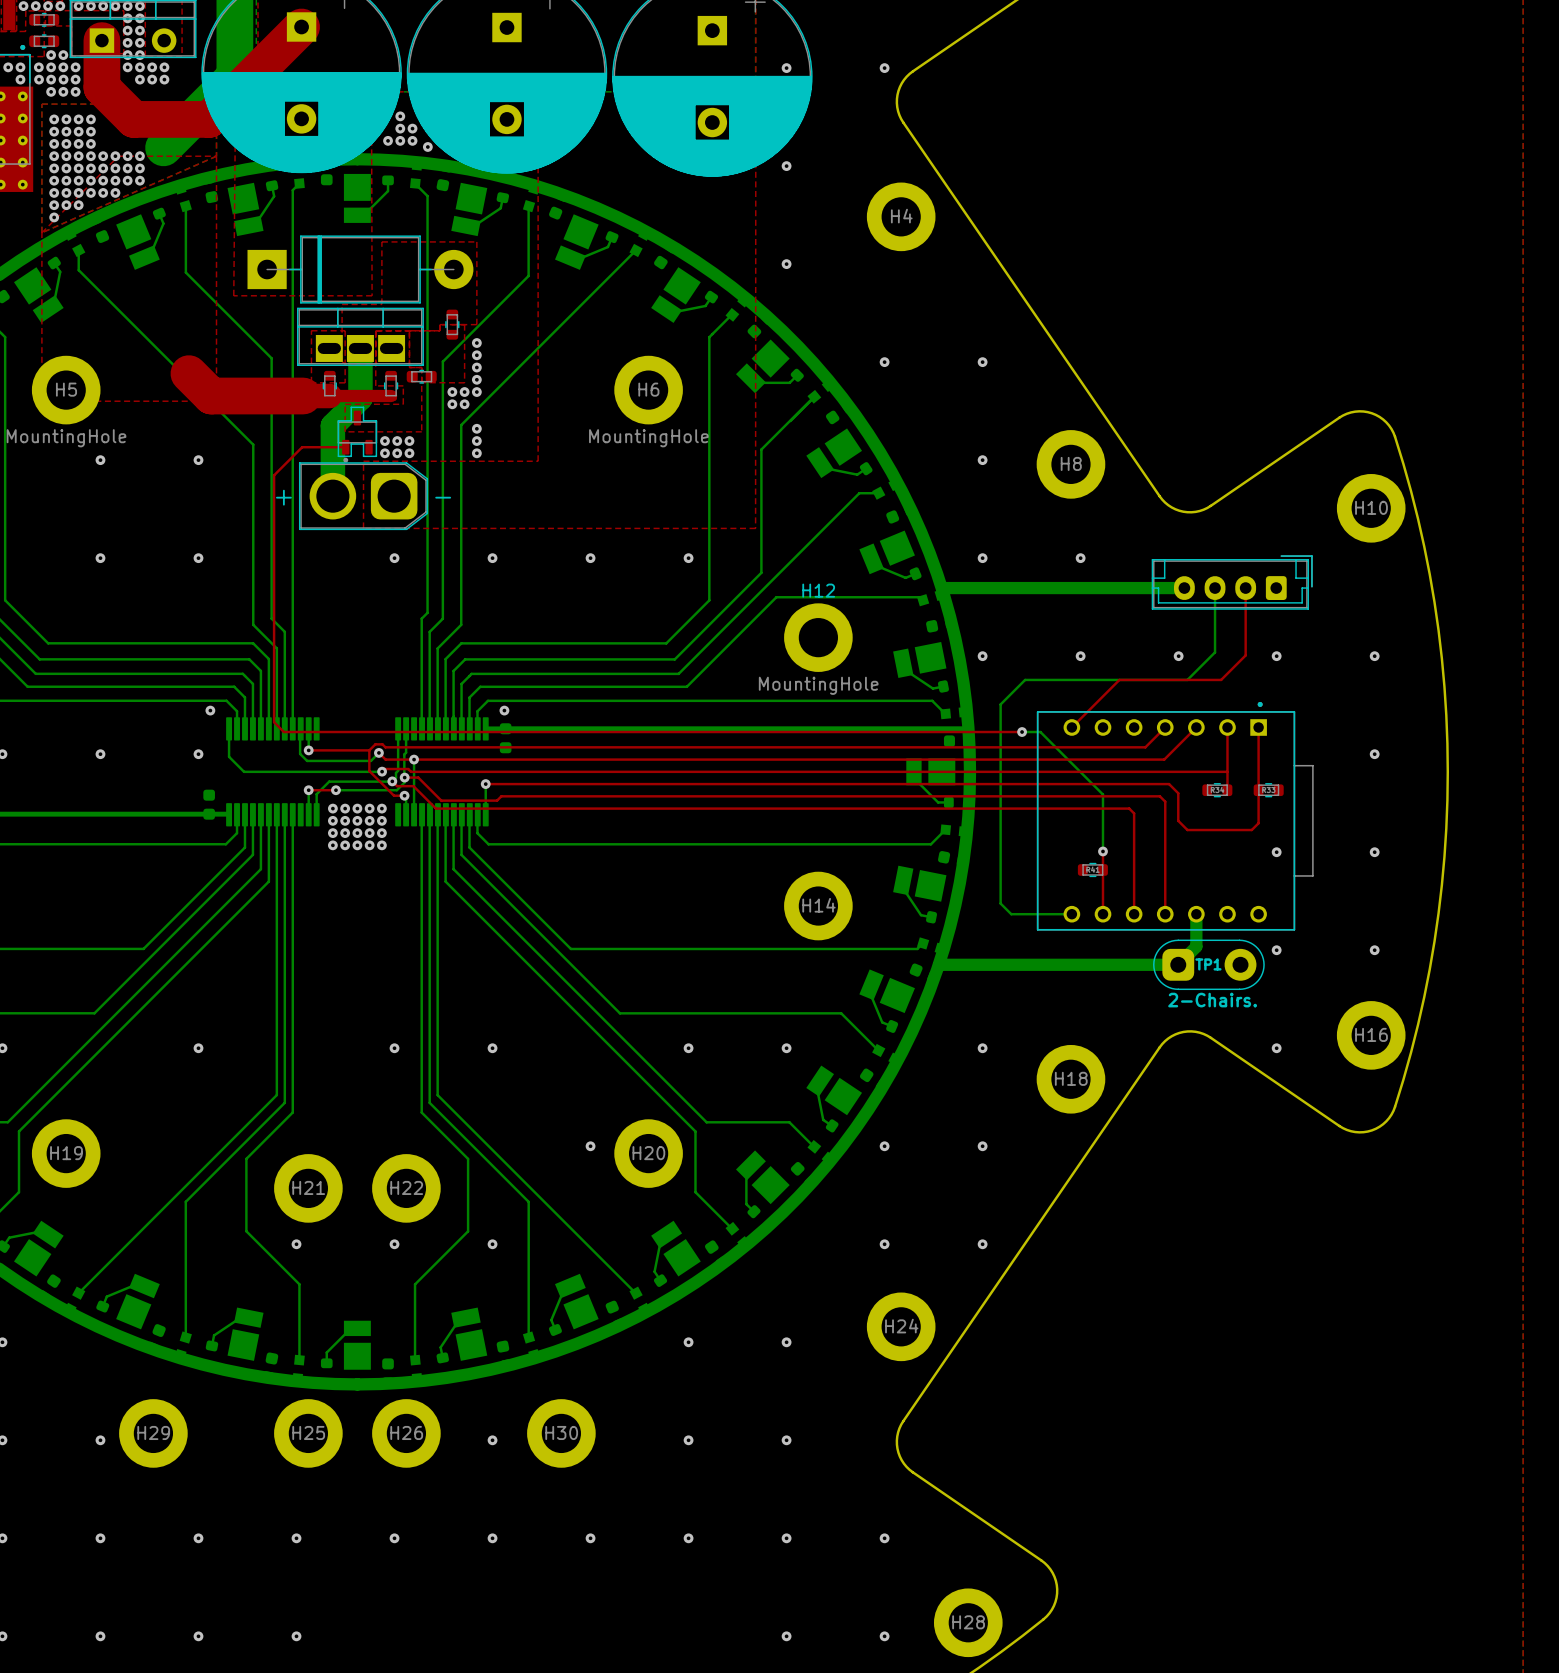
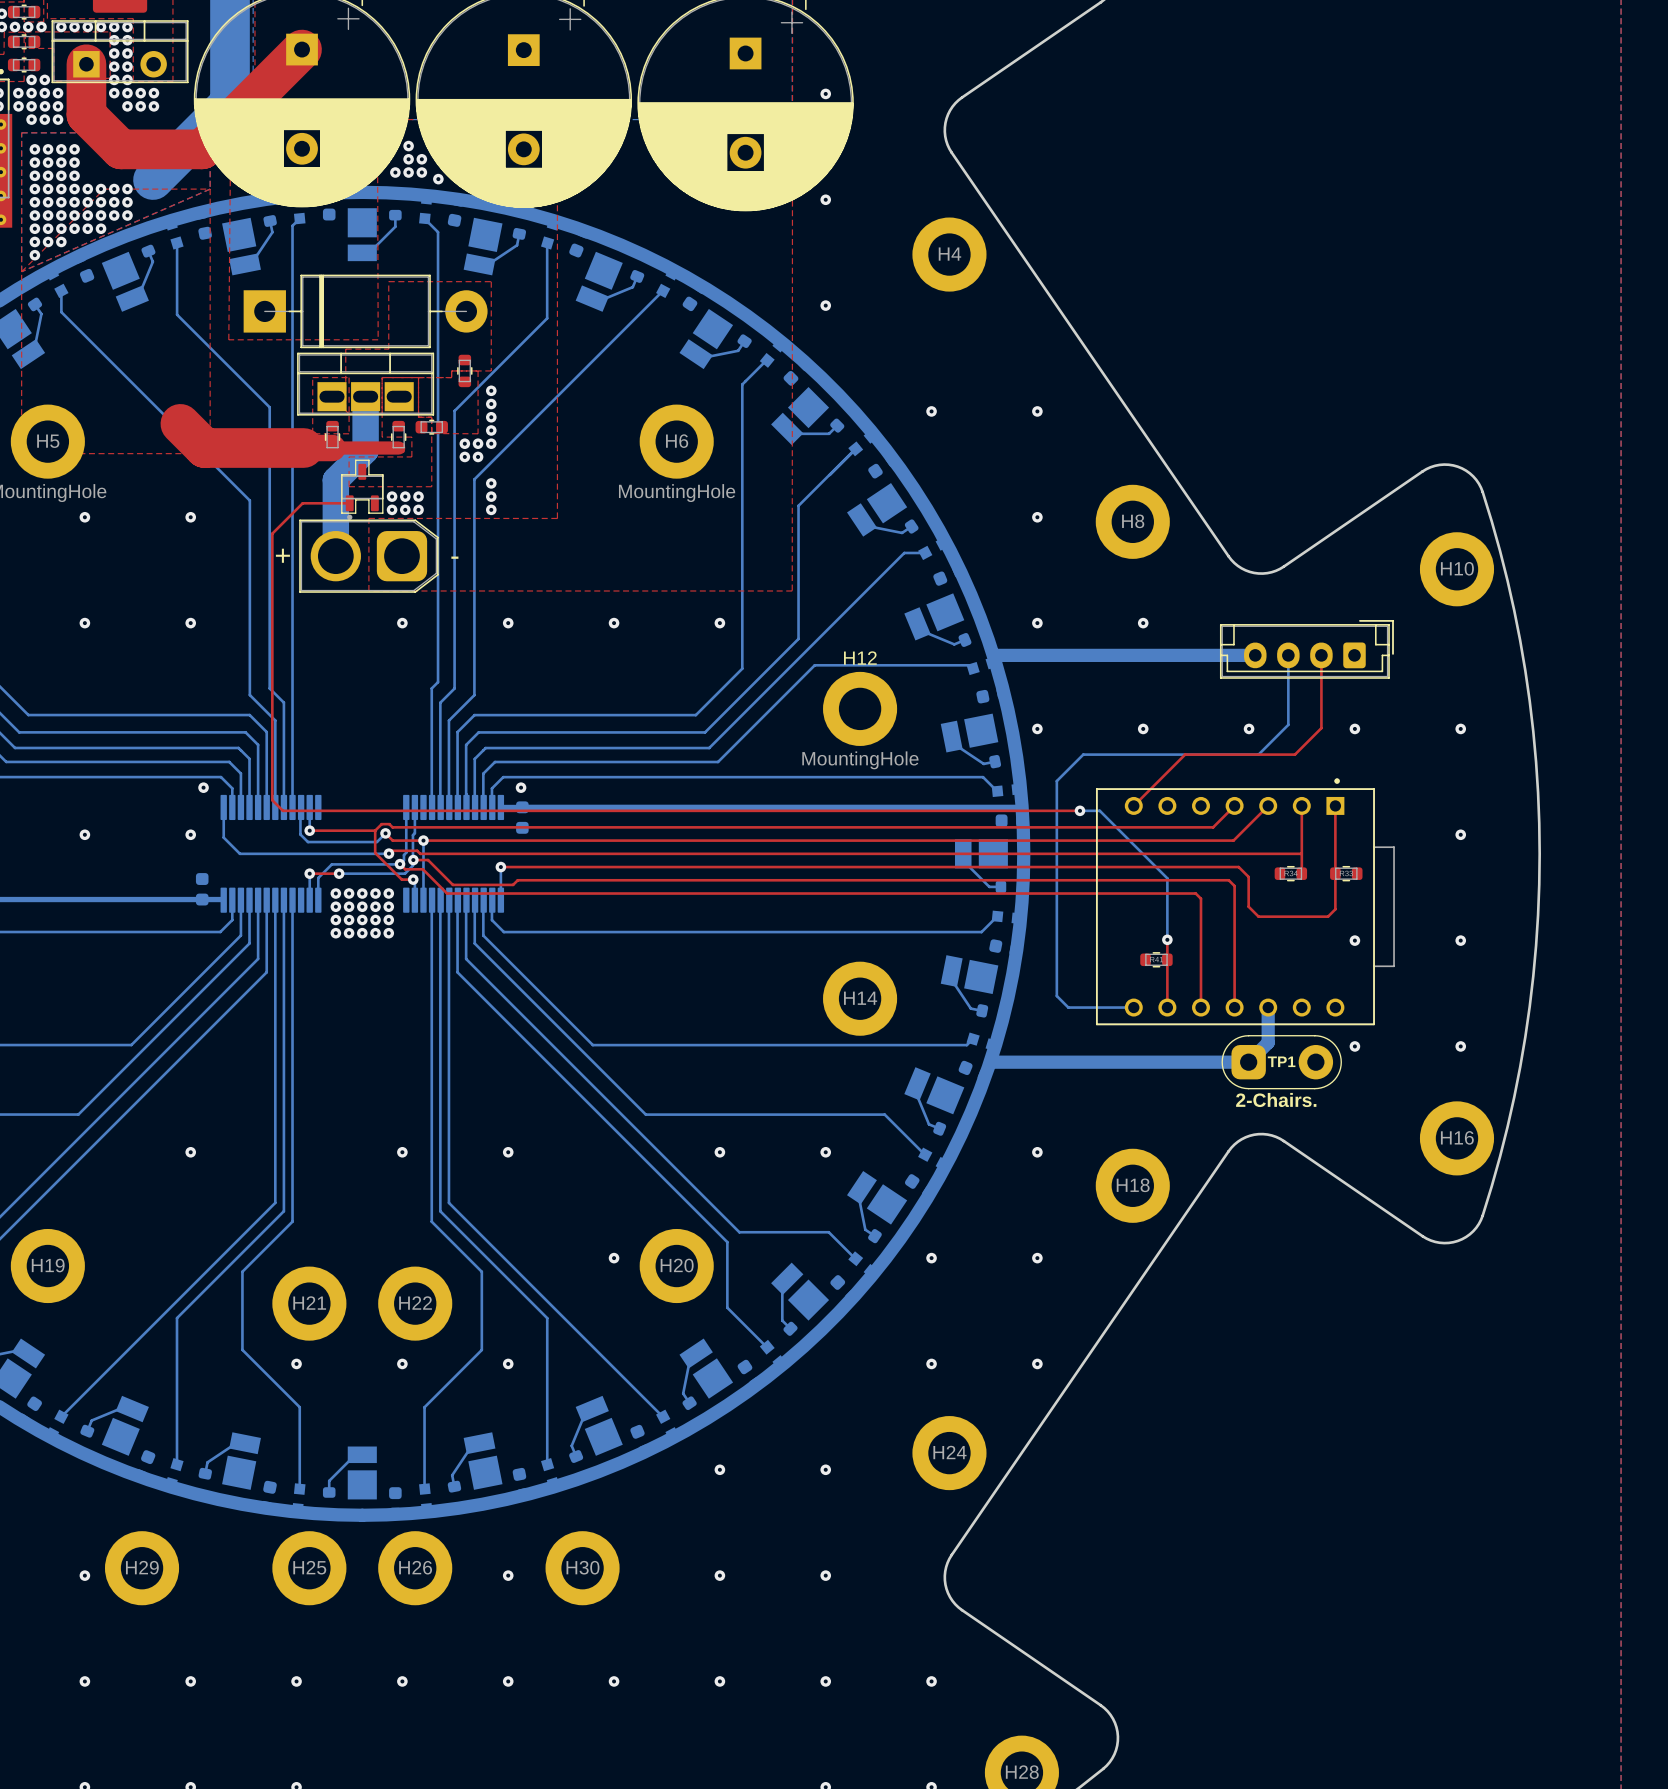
via: (884, 68) -> none
via: (1276, 1048) -> none

